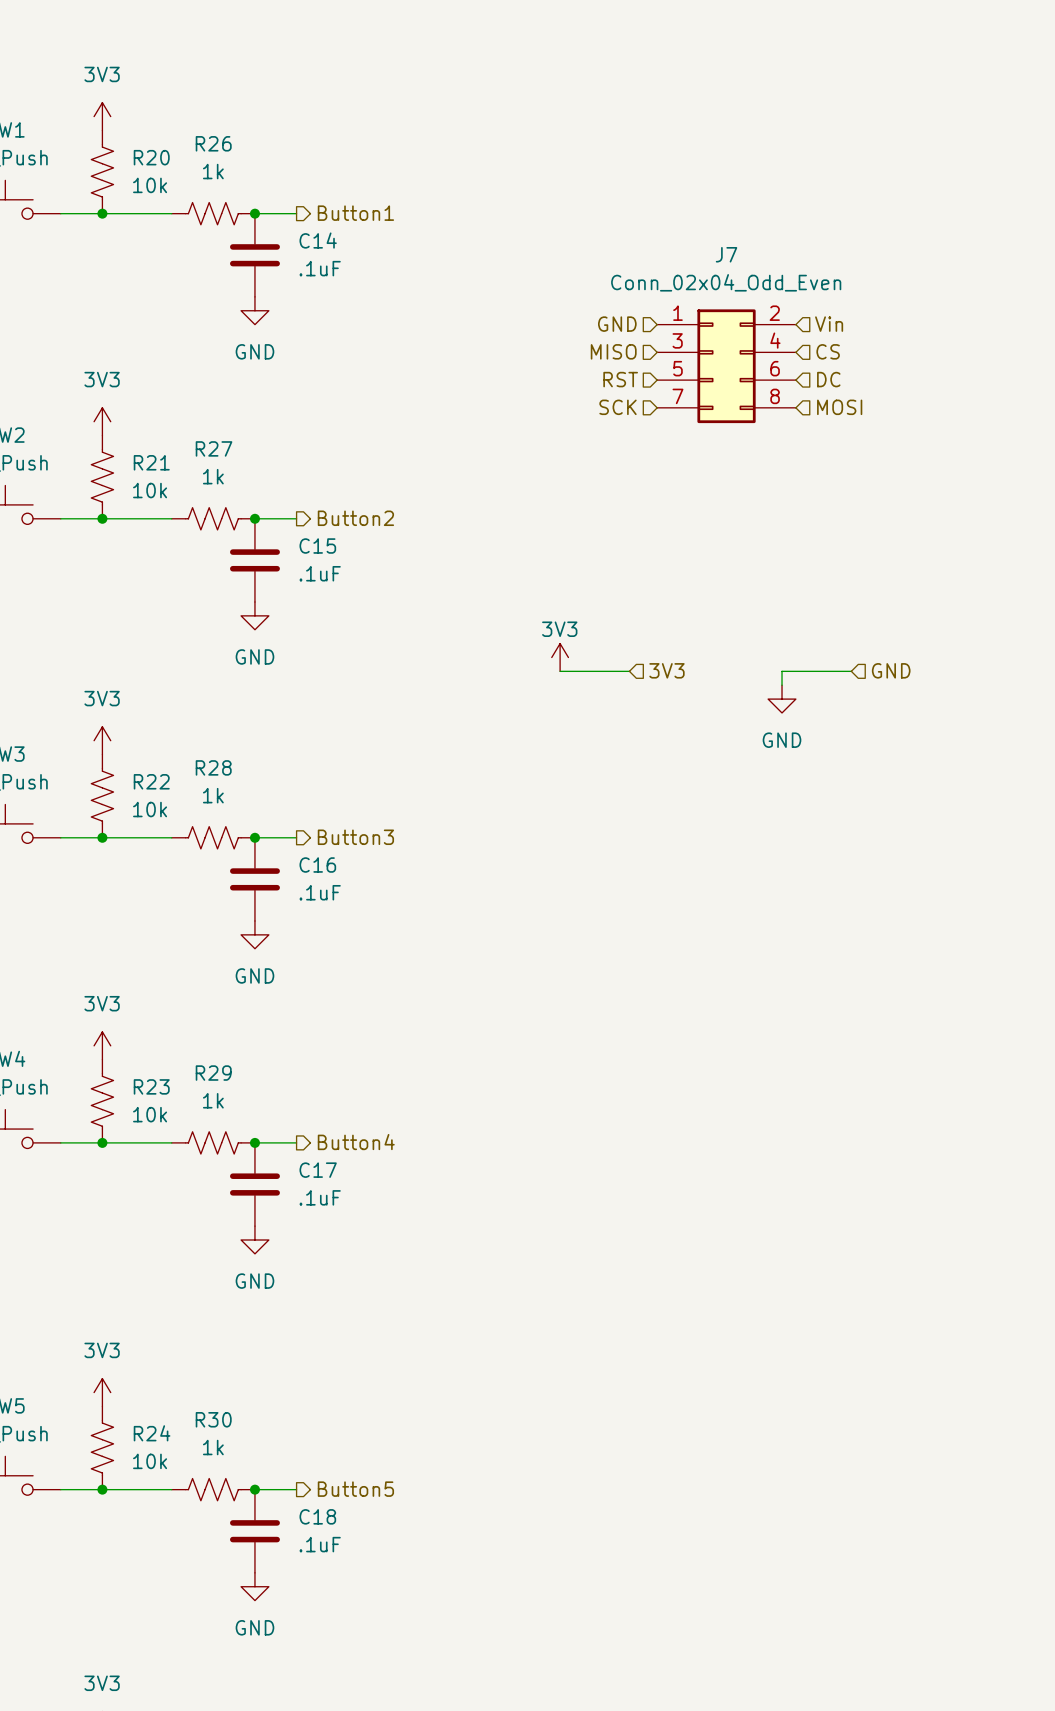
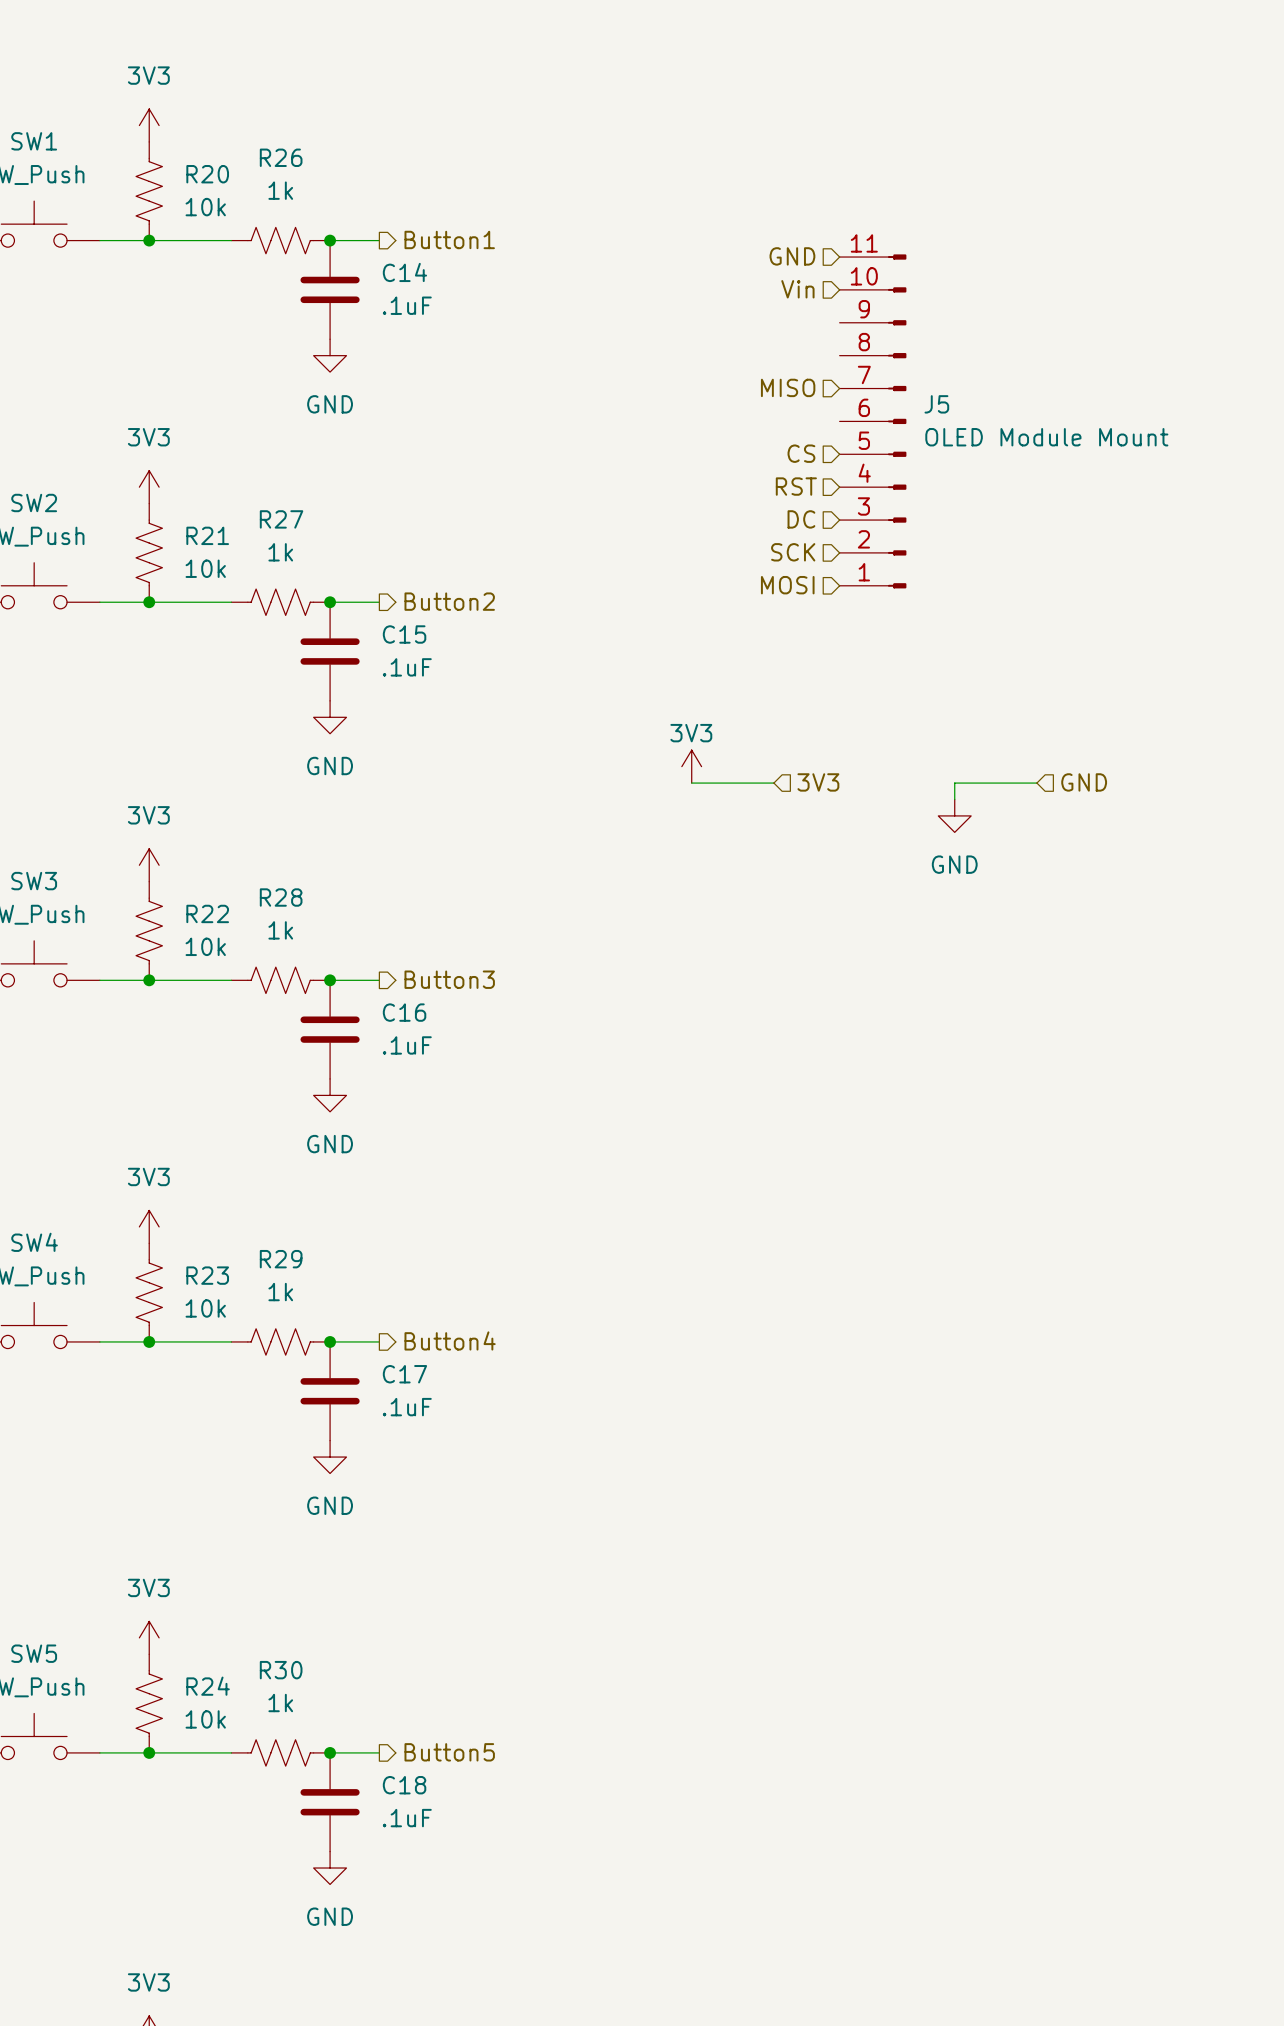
hierarchical label position: GND (617, 324) -> GND (792, 256)
hierarchical label rotation: 0° (829, 324) -> 180° (797, 289)
hierarchical label position: Vin (829, 324) -> Vin (797, 289)
hierarchical label position: MISO (613, 351) -> MISO (788, 387)
hierarchical label rotation: 0° (828, 351) -> 180° (801, 453)
hierarchical label position: CS (828, 351) -> CS (801, 453)
J5: none -> OLED Module Mount (873, 421)
J7: Conn_02x04_Odd_Even (726, 366) -> none
hierarchical label position: RST (620, 379) -> RST (796, 486)
hierarchical label rotation: 0° (828, 379) -> 180° (801, 519)
hierarchical label position: DC (828, 379) -> DC (801, 519)
hierarchical label position: SCK (618, 407) -> SCK (793, 552)
hierarchical label rotation: 0° (839, 407) -> 180° (787, 585)
hierarchical label position: MOSI (839, 407) -> MOSI (787, 585)

